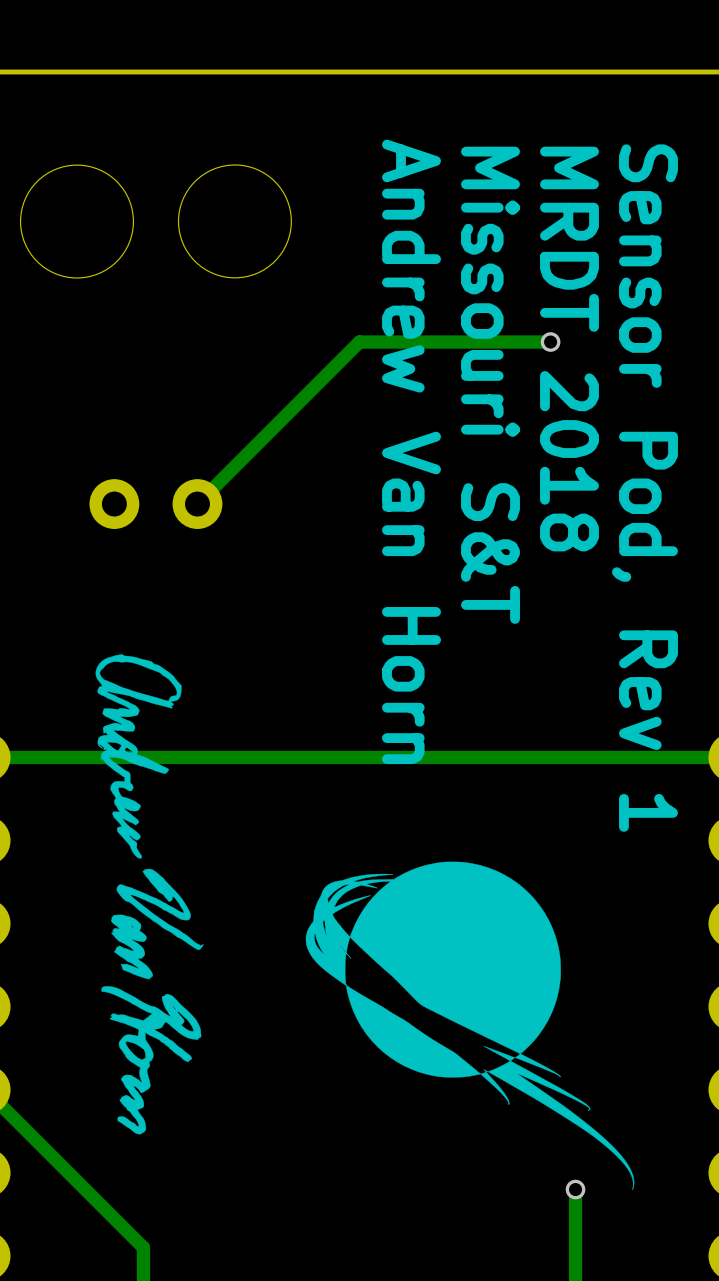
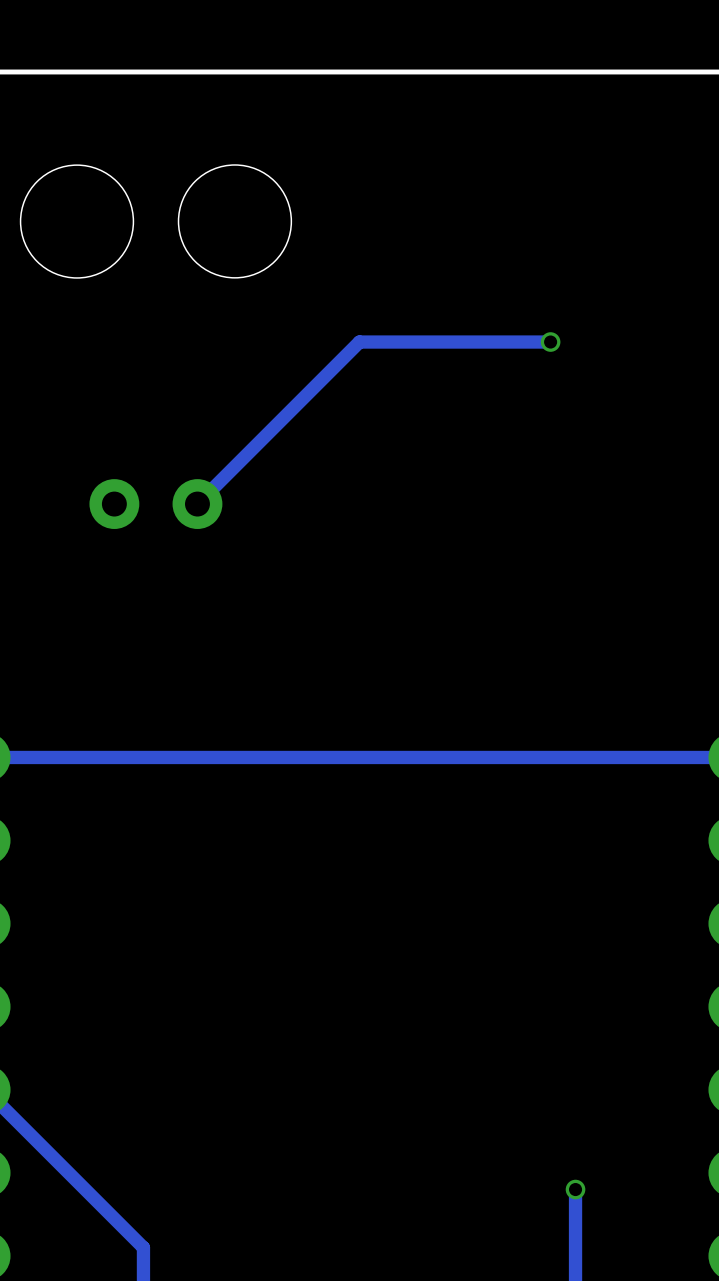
text: MRDT 2018 (569, 349) -> none
text: Missouri S&T (490, 385) -> none
text: Andrew Van Horn (411, 451) -> none
text: Sensor Pod, Rev 1 (645, 488) -> none
drawing: [95, 654, 204, 1135] -> none
drawing: [305, 861, 635, 1191] -> none

